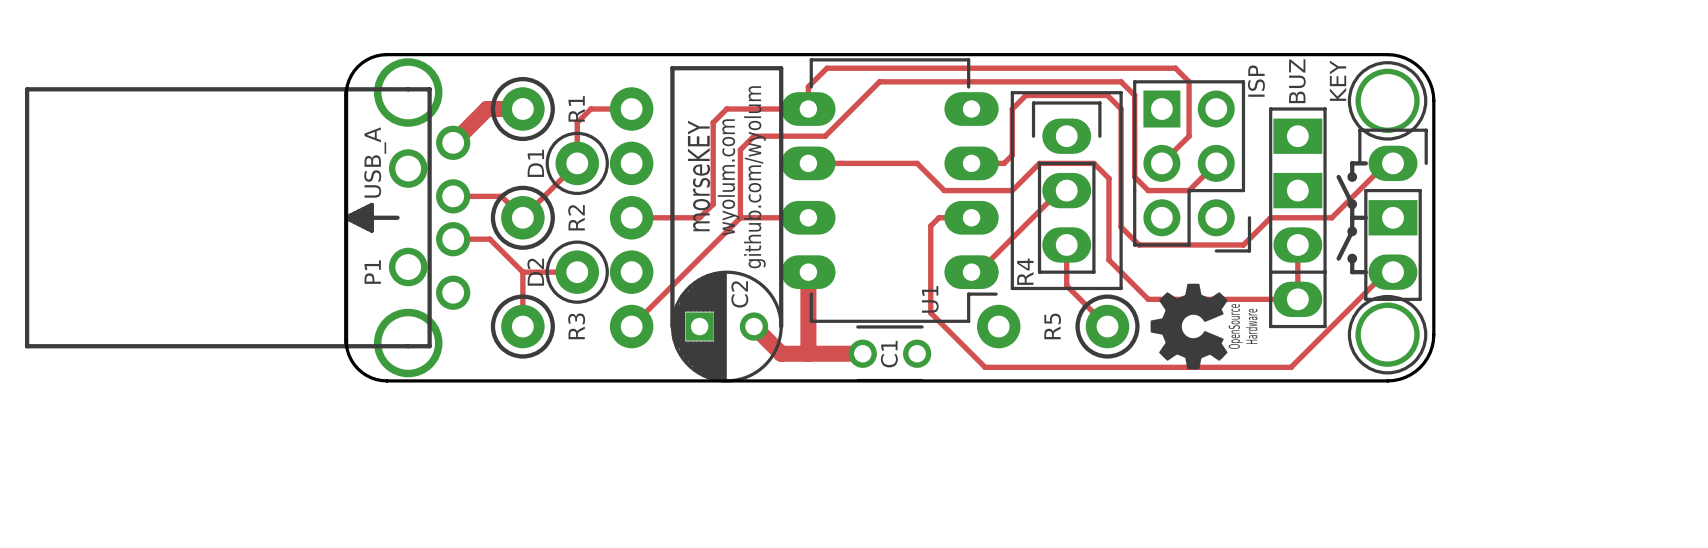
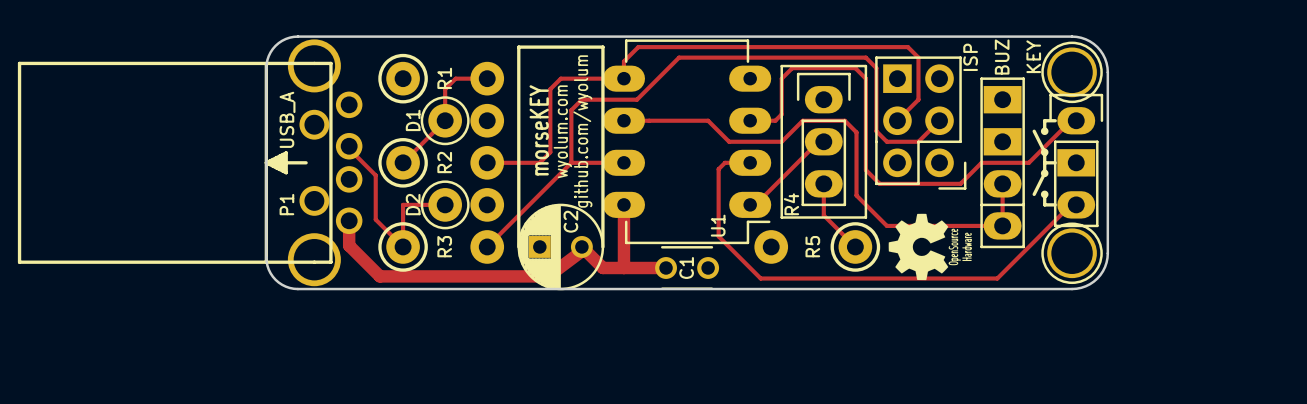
track: (522, 109) (487, 109) (453, 142) -> none
track: (453, 196) (501, 196) (522, 217) -> (349, 146) (349, 148) (375, 175) (375, 219) (403, 246)
track: (453, 239) (489, 239) (522, 272) -> none
track: none -> (349, 220) (349, 245) (379, 276) (548, 276) (581, 251) (581, 246)

